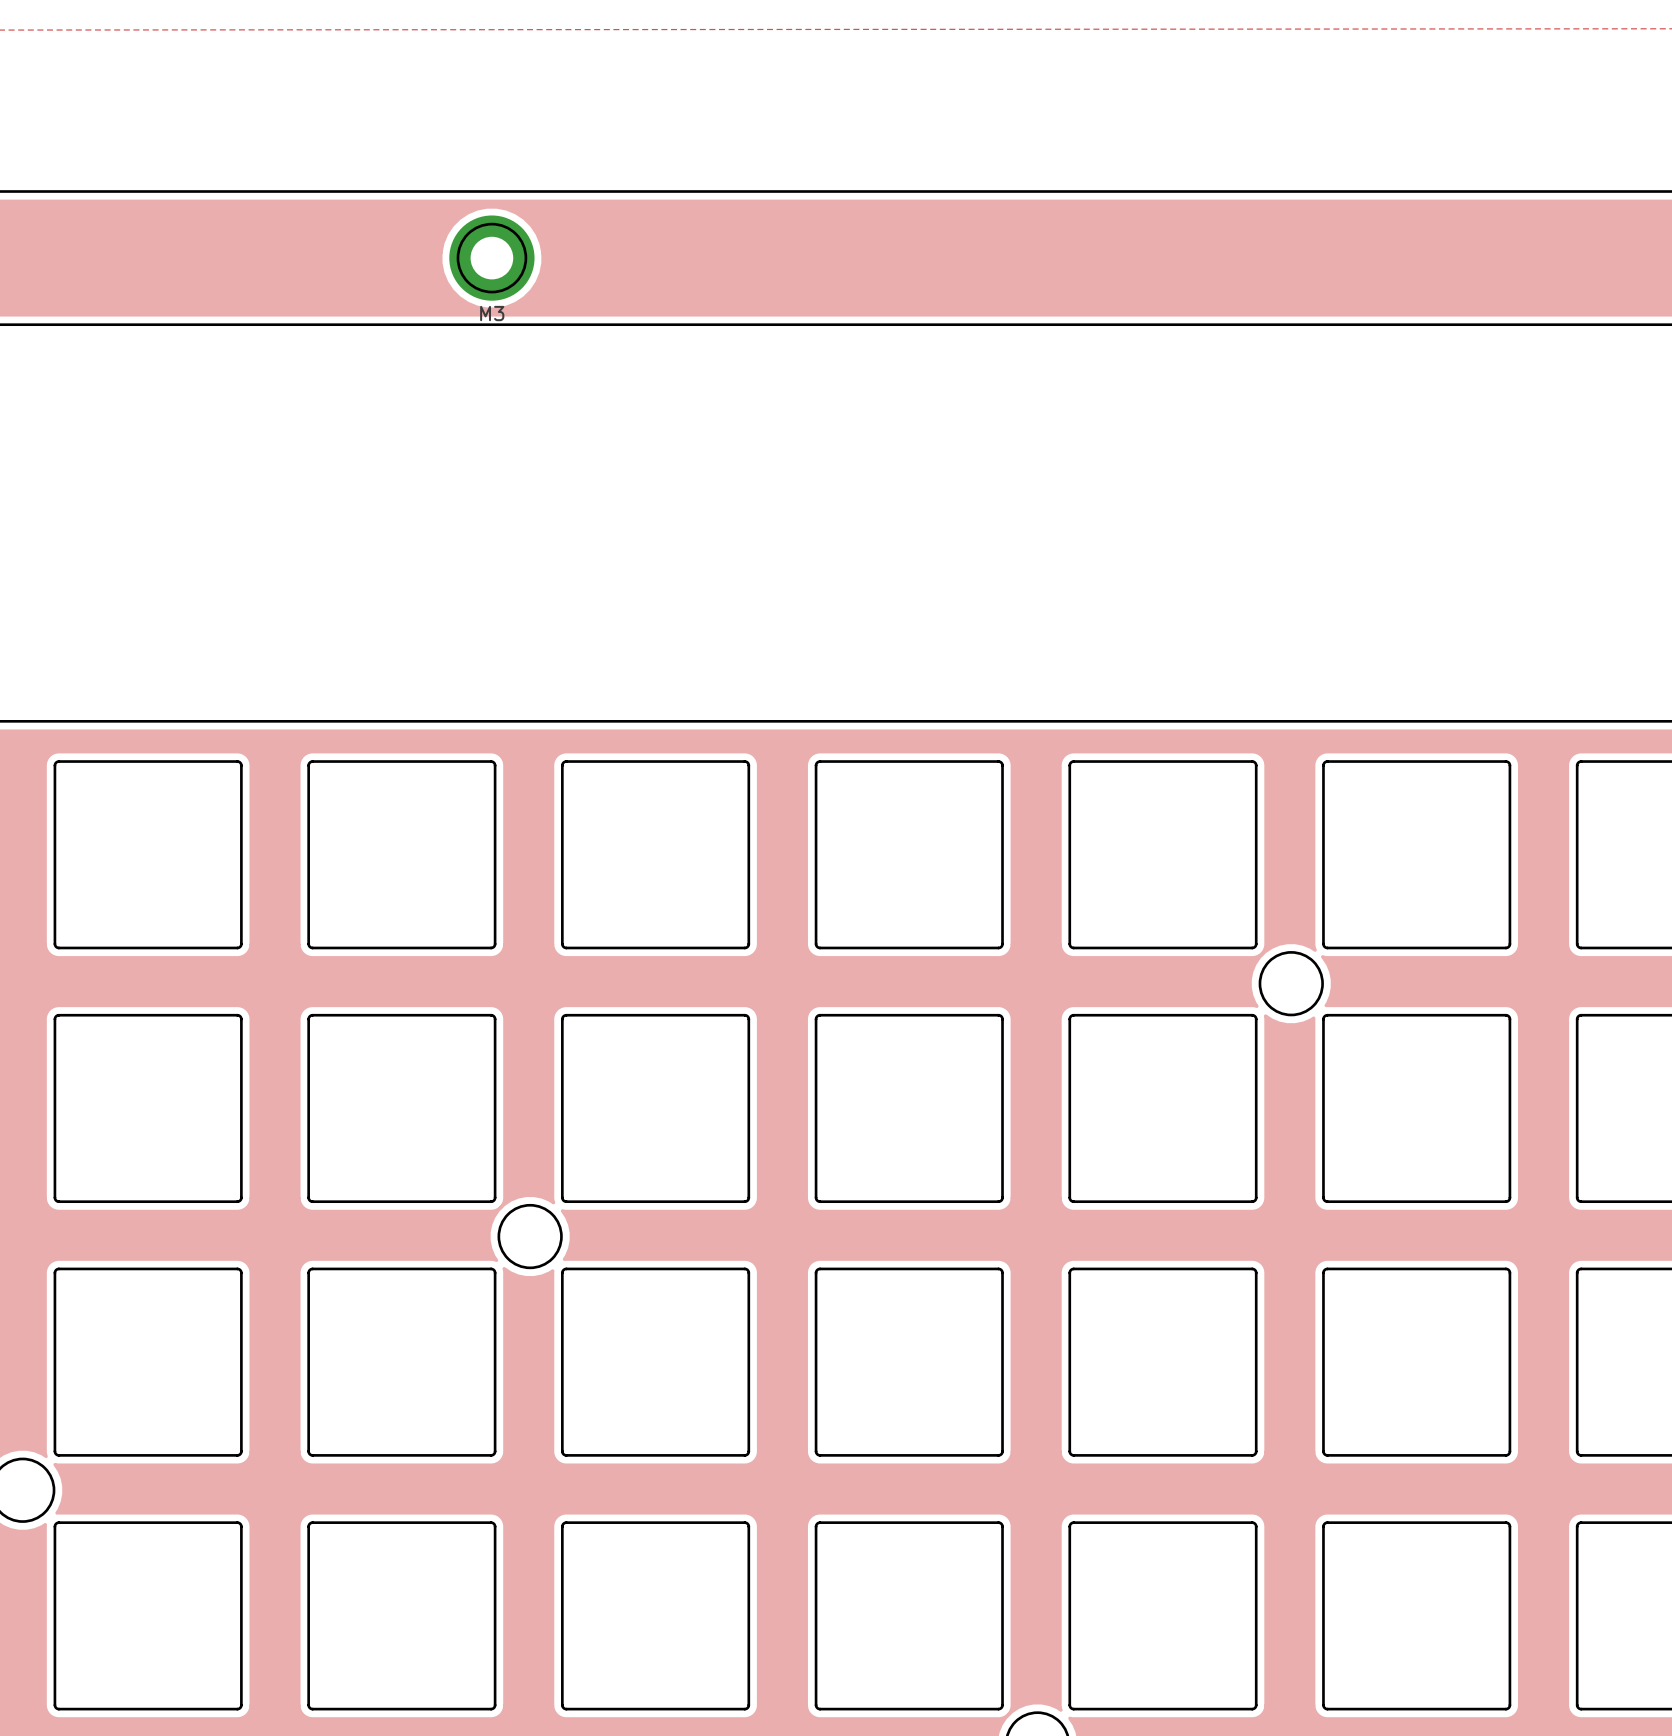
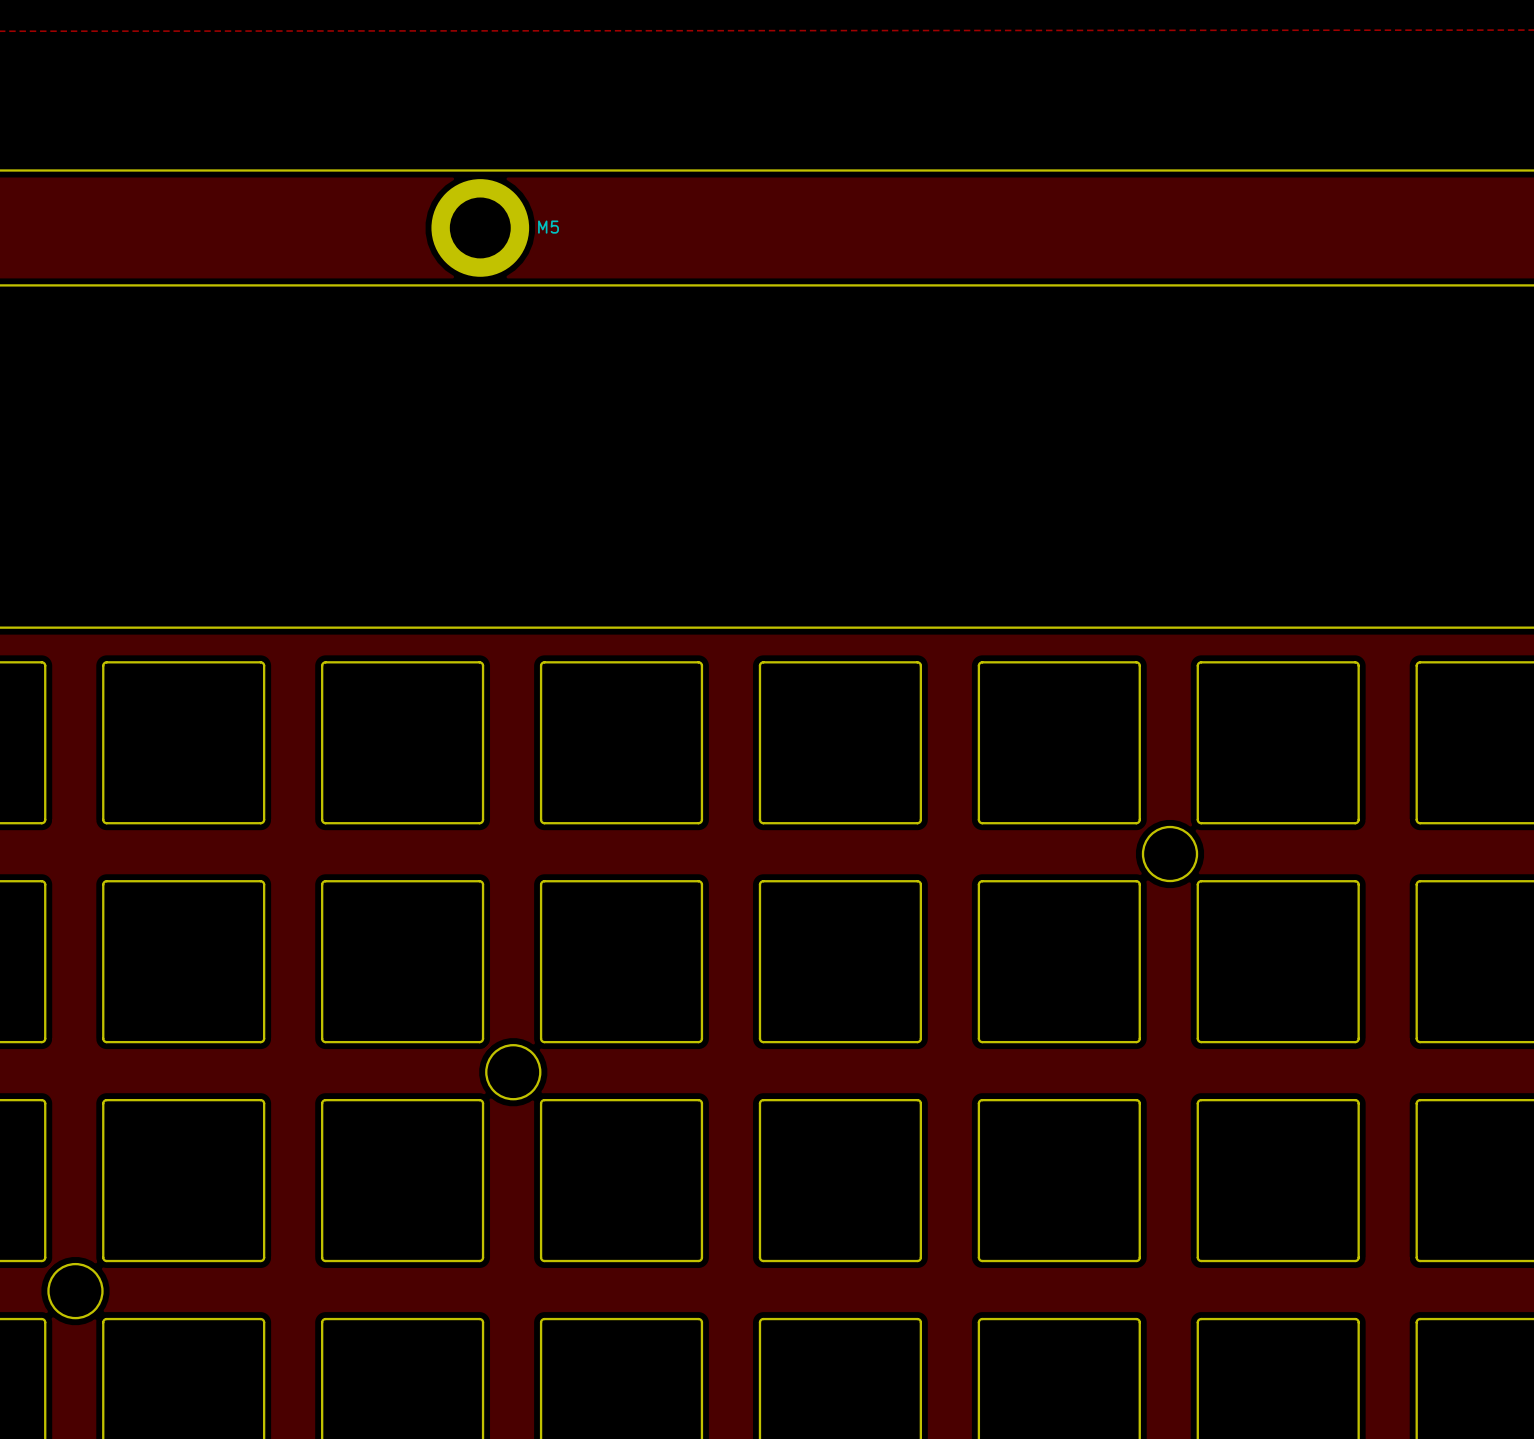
part footprint: [449, 215, 535, 301] -> [431, 179, 530, 277]
round board edge: [456, 222, 528, 294] -> none
part value: M3 (492, 313) -> M5 (548, 227)

